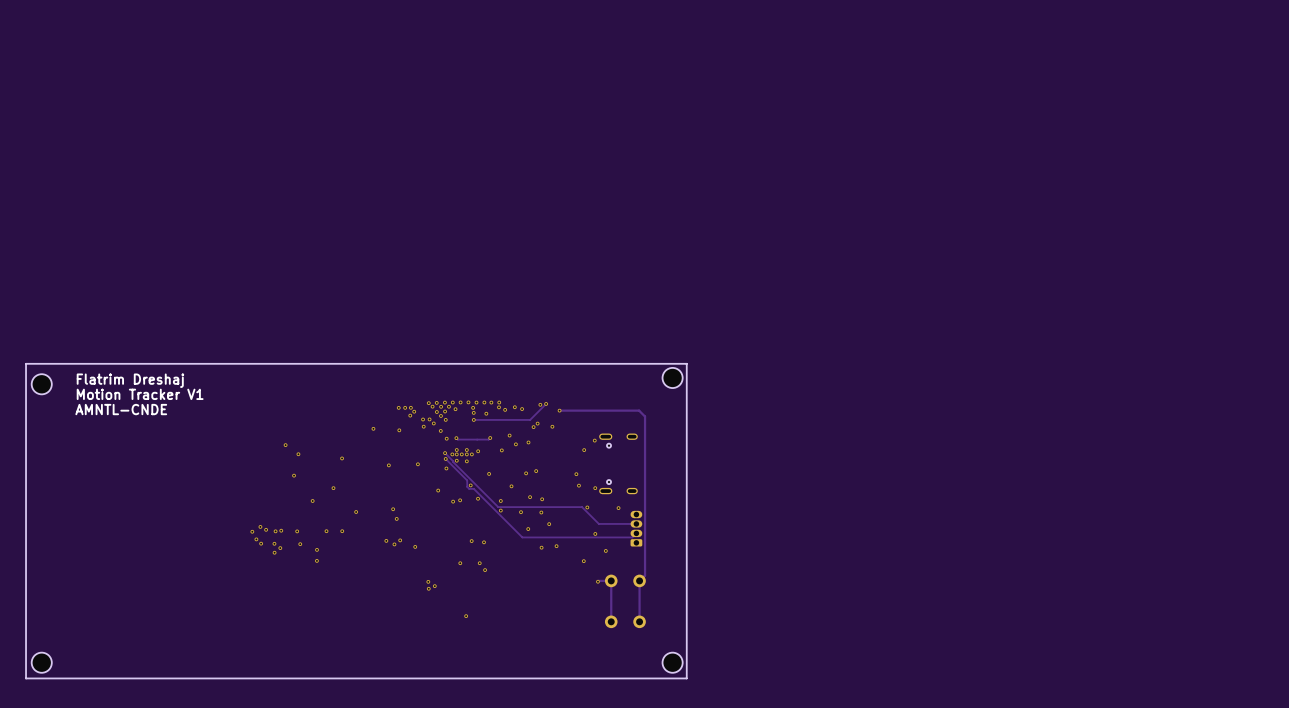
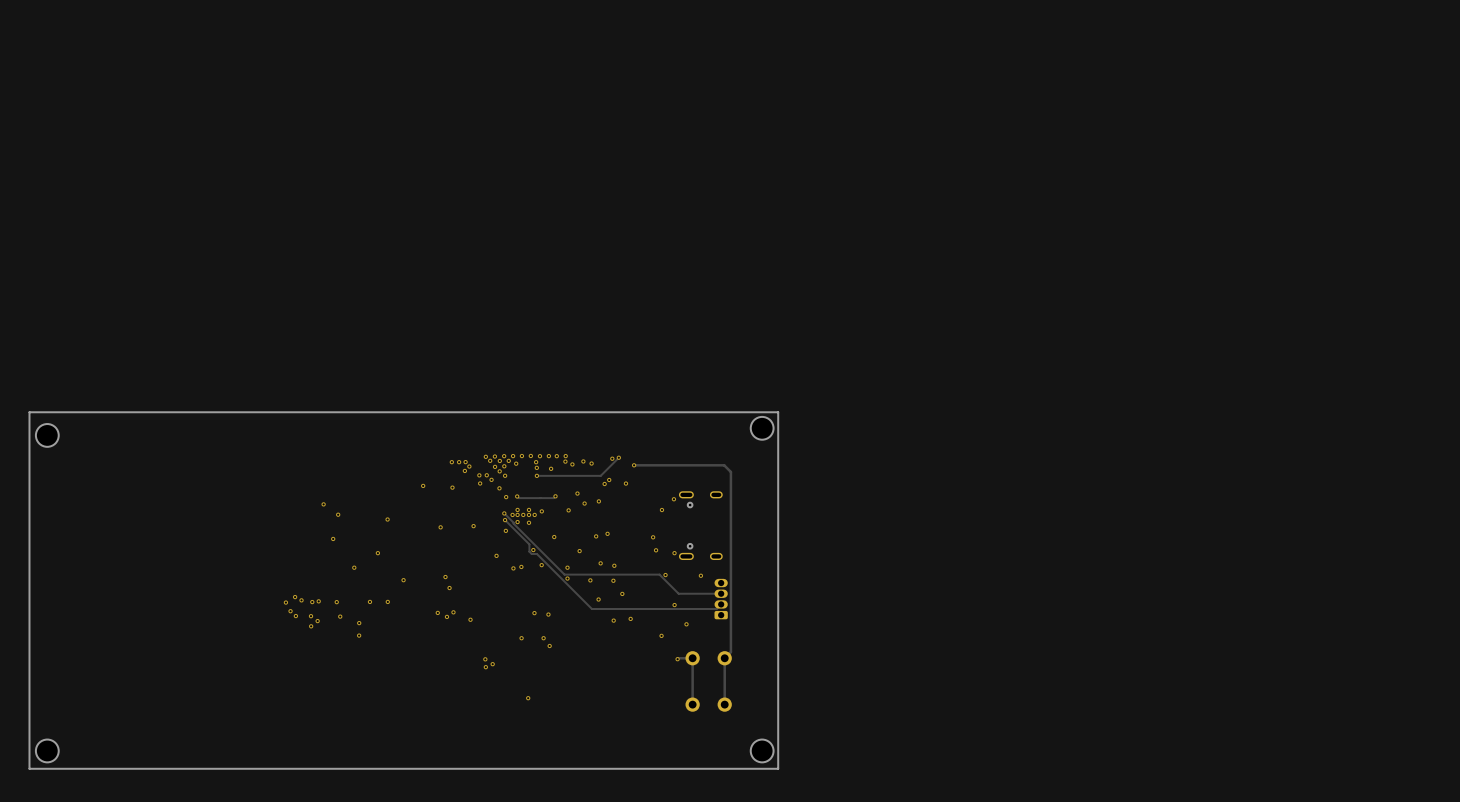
text: Flatrim Dreshaj (130, 380) -> none
text: Motion Tracker V1 (140, 394) -> none
text: AMNTL-CNDE (121, 409) -> none

